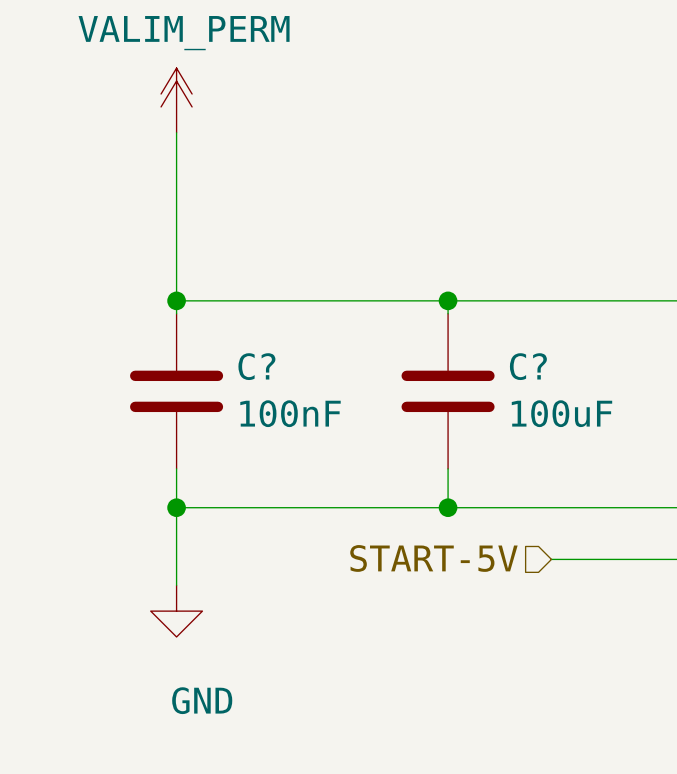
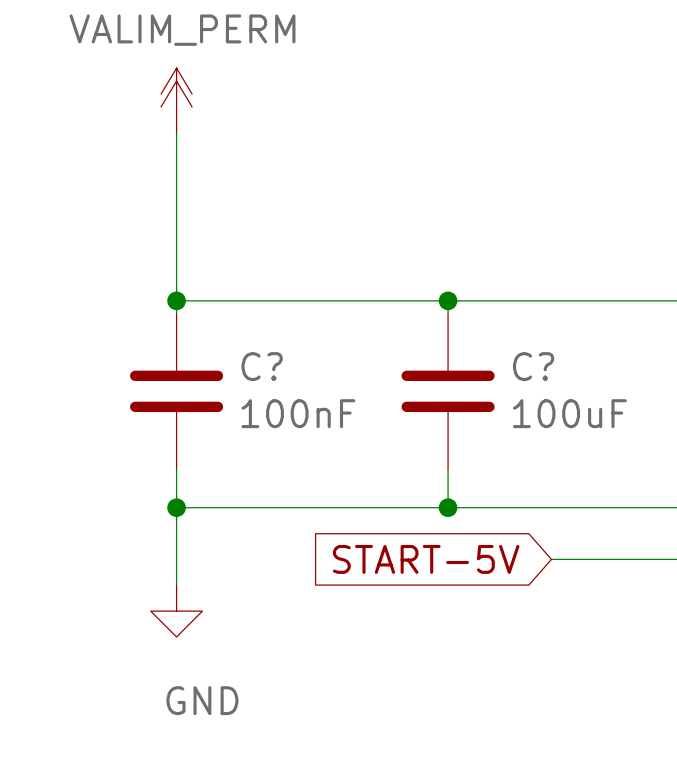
hierarchical label: START-5V (433, 558) -> none
global label: none -> START-5V (426, 559)

